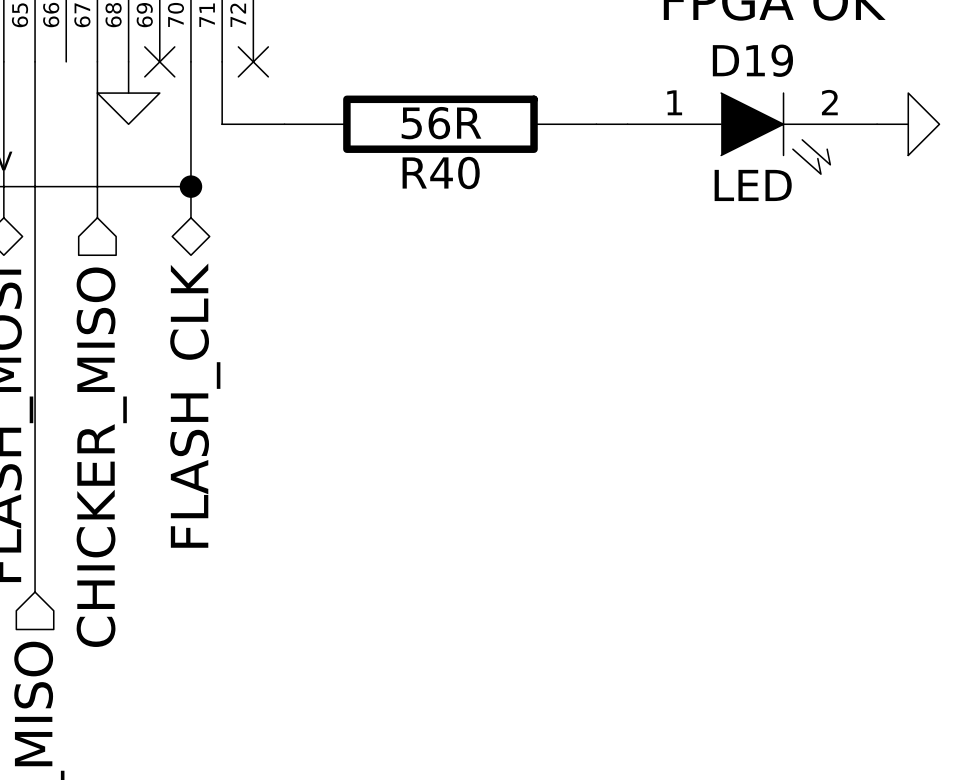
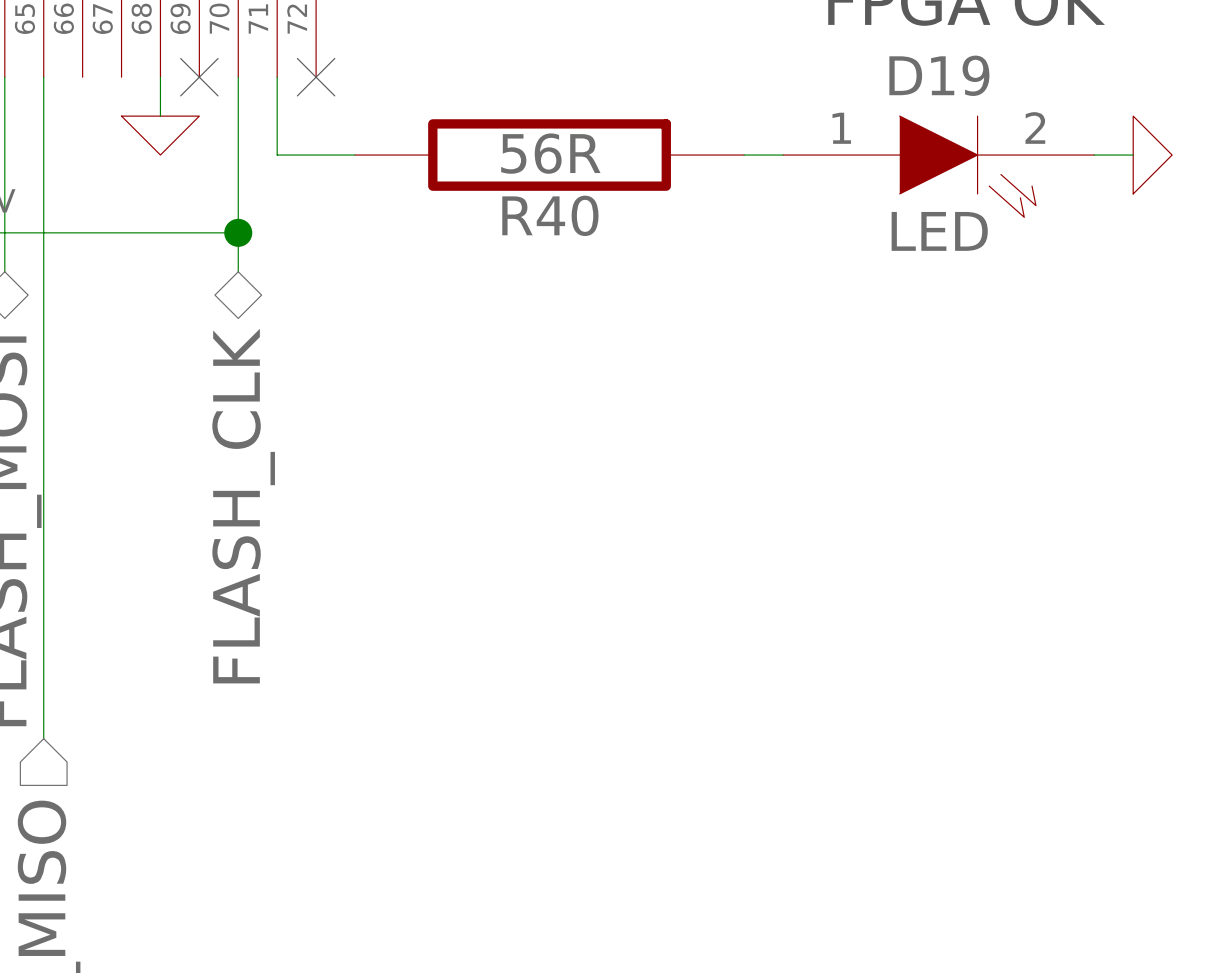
wire: (97, 61) (97, 217) -> none
hierarchical label: CHICKER_MISO (101, 457) -> none

